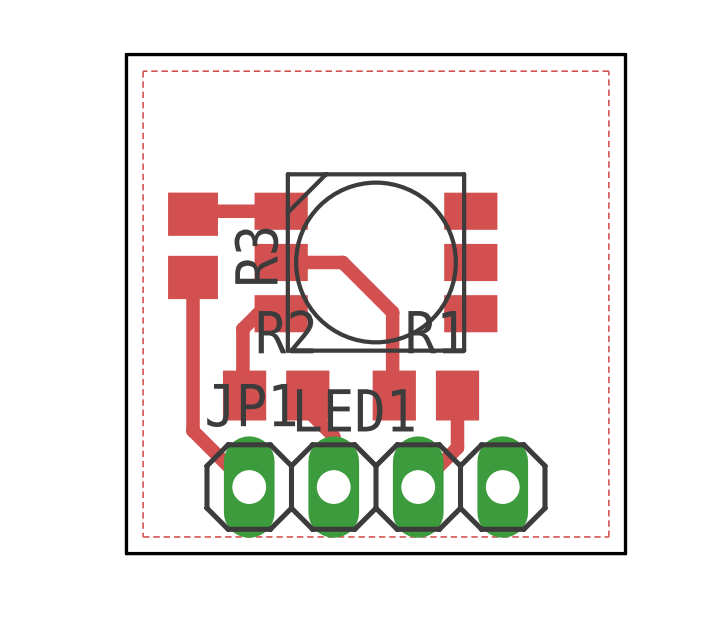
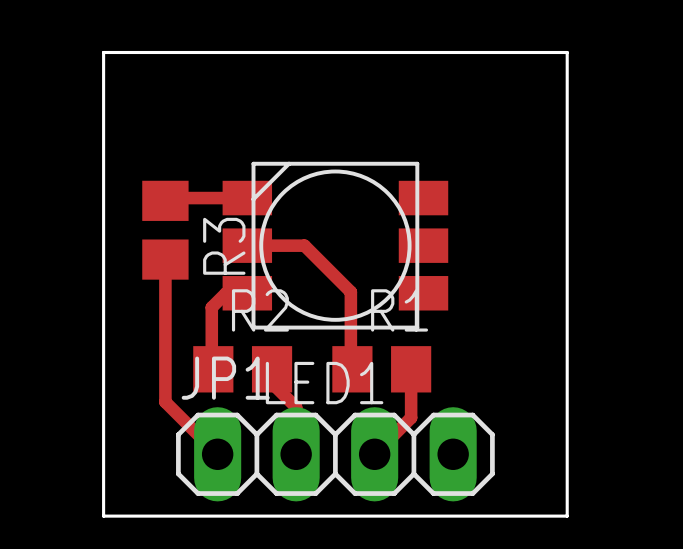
zone outline: (143, 71) (608, 71) (608, 536) (143, 536) (143, 71) -> none

